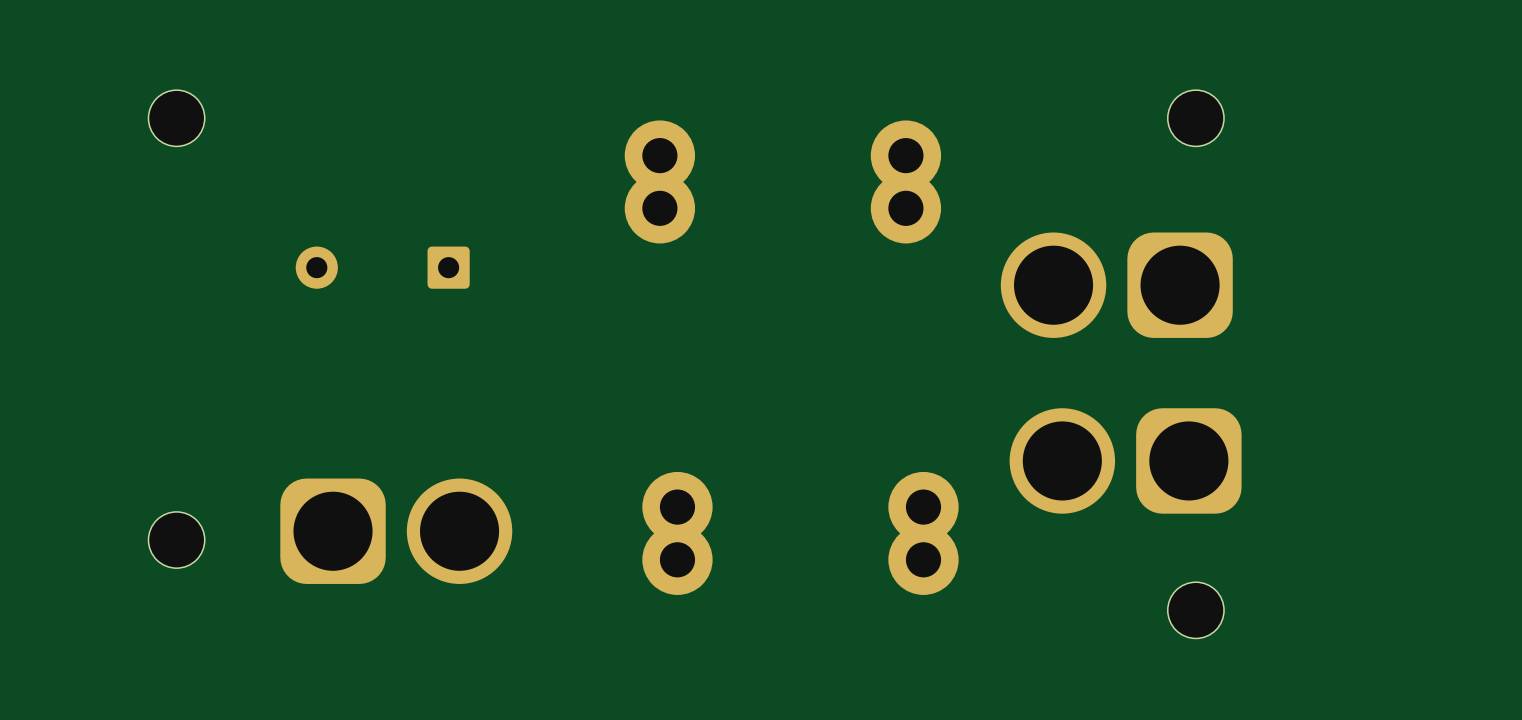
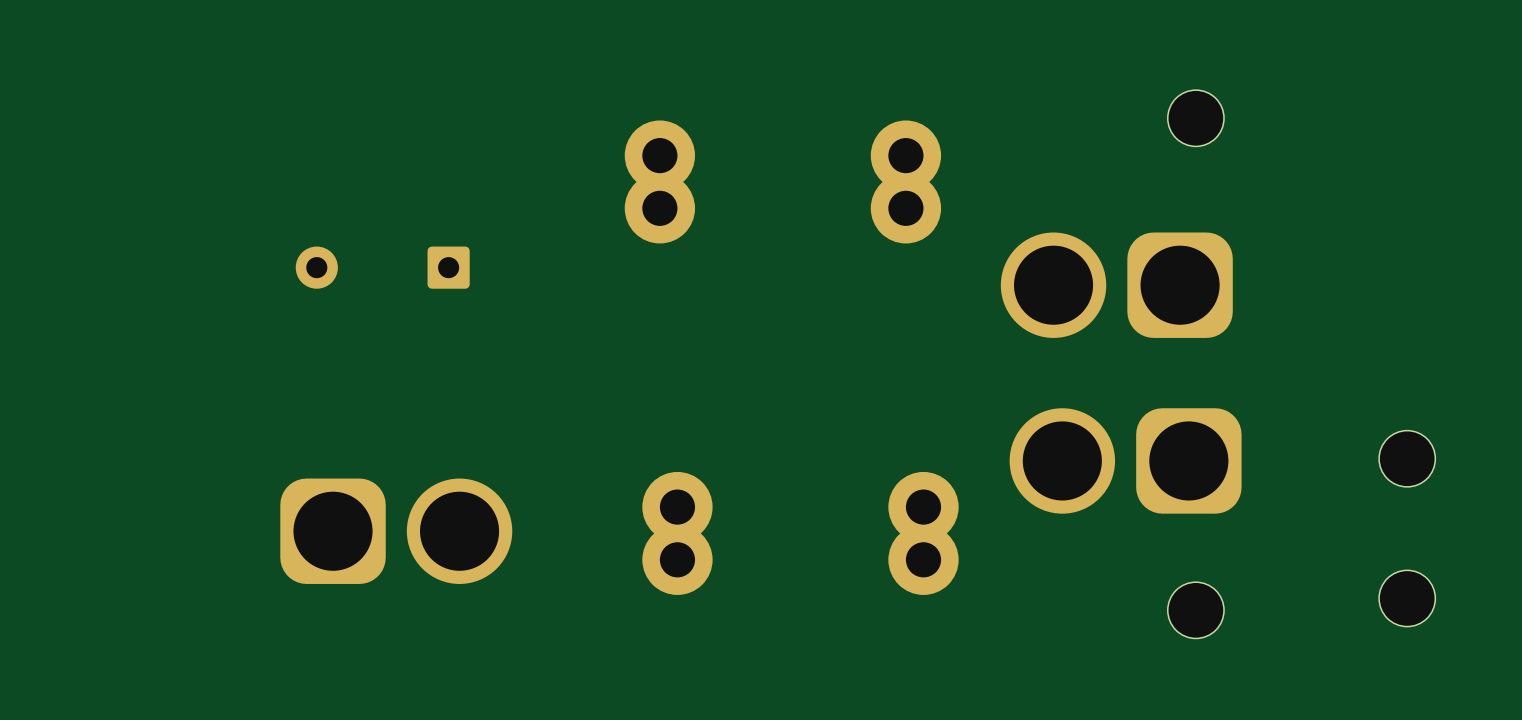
part: (176, 118) -> none
part: none -> (1407, 458)
part: (176, 540) -> none
part: none -> (1407, 598)

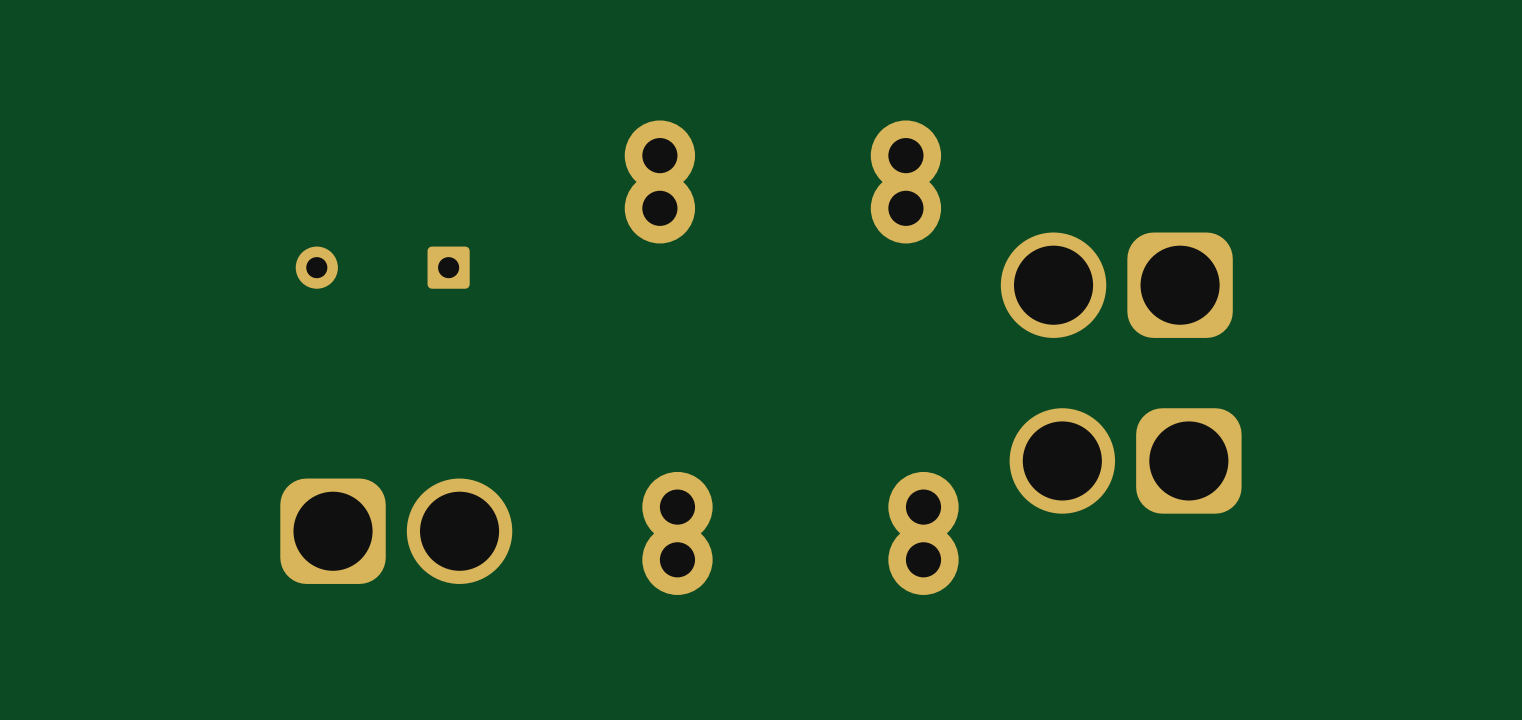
part: (1195, 118) -> none
part: (1407, 458) -> none
part: (1407, 598) -> none
part: (1195, 610) -> none

